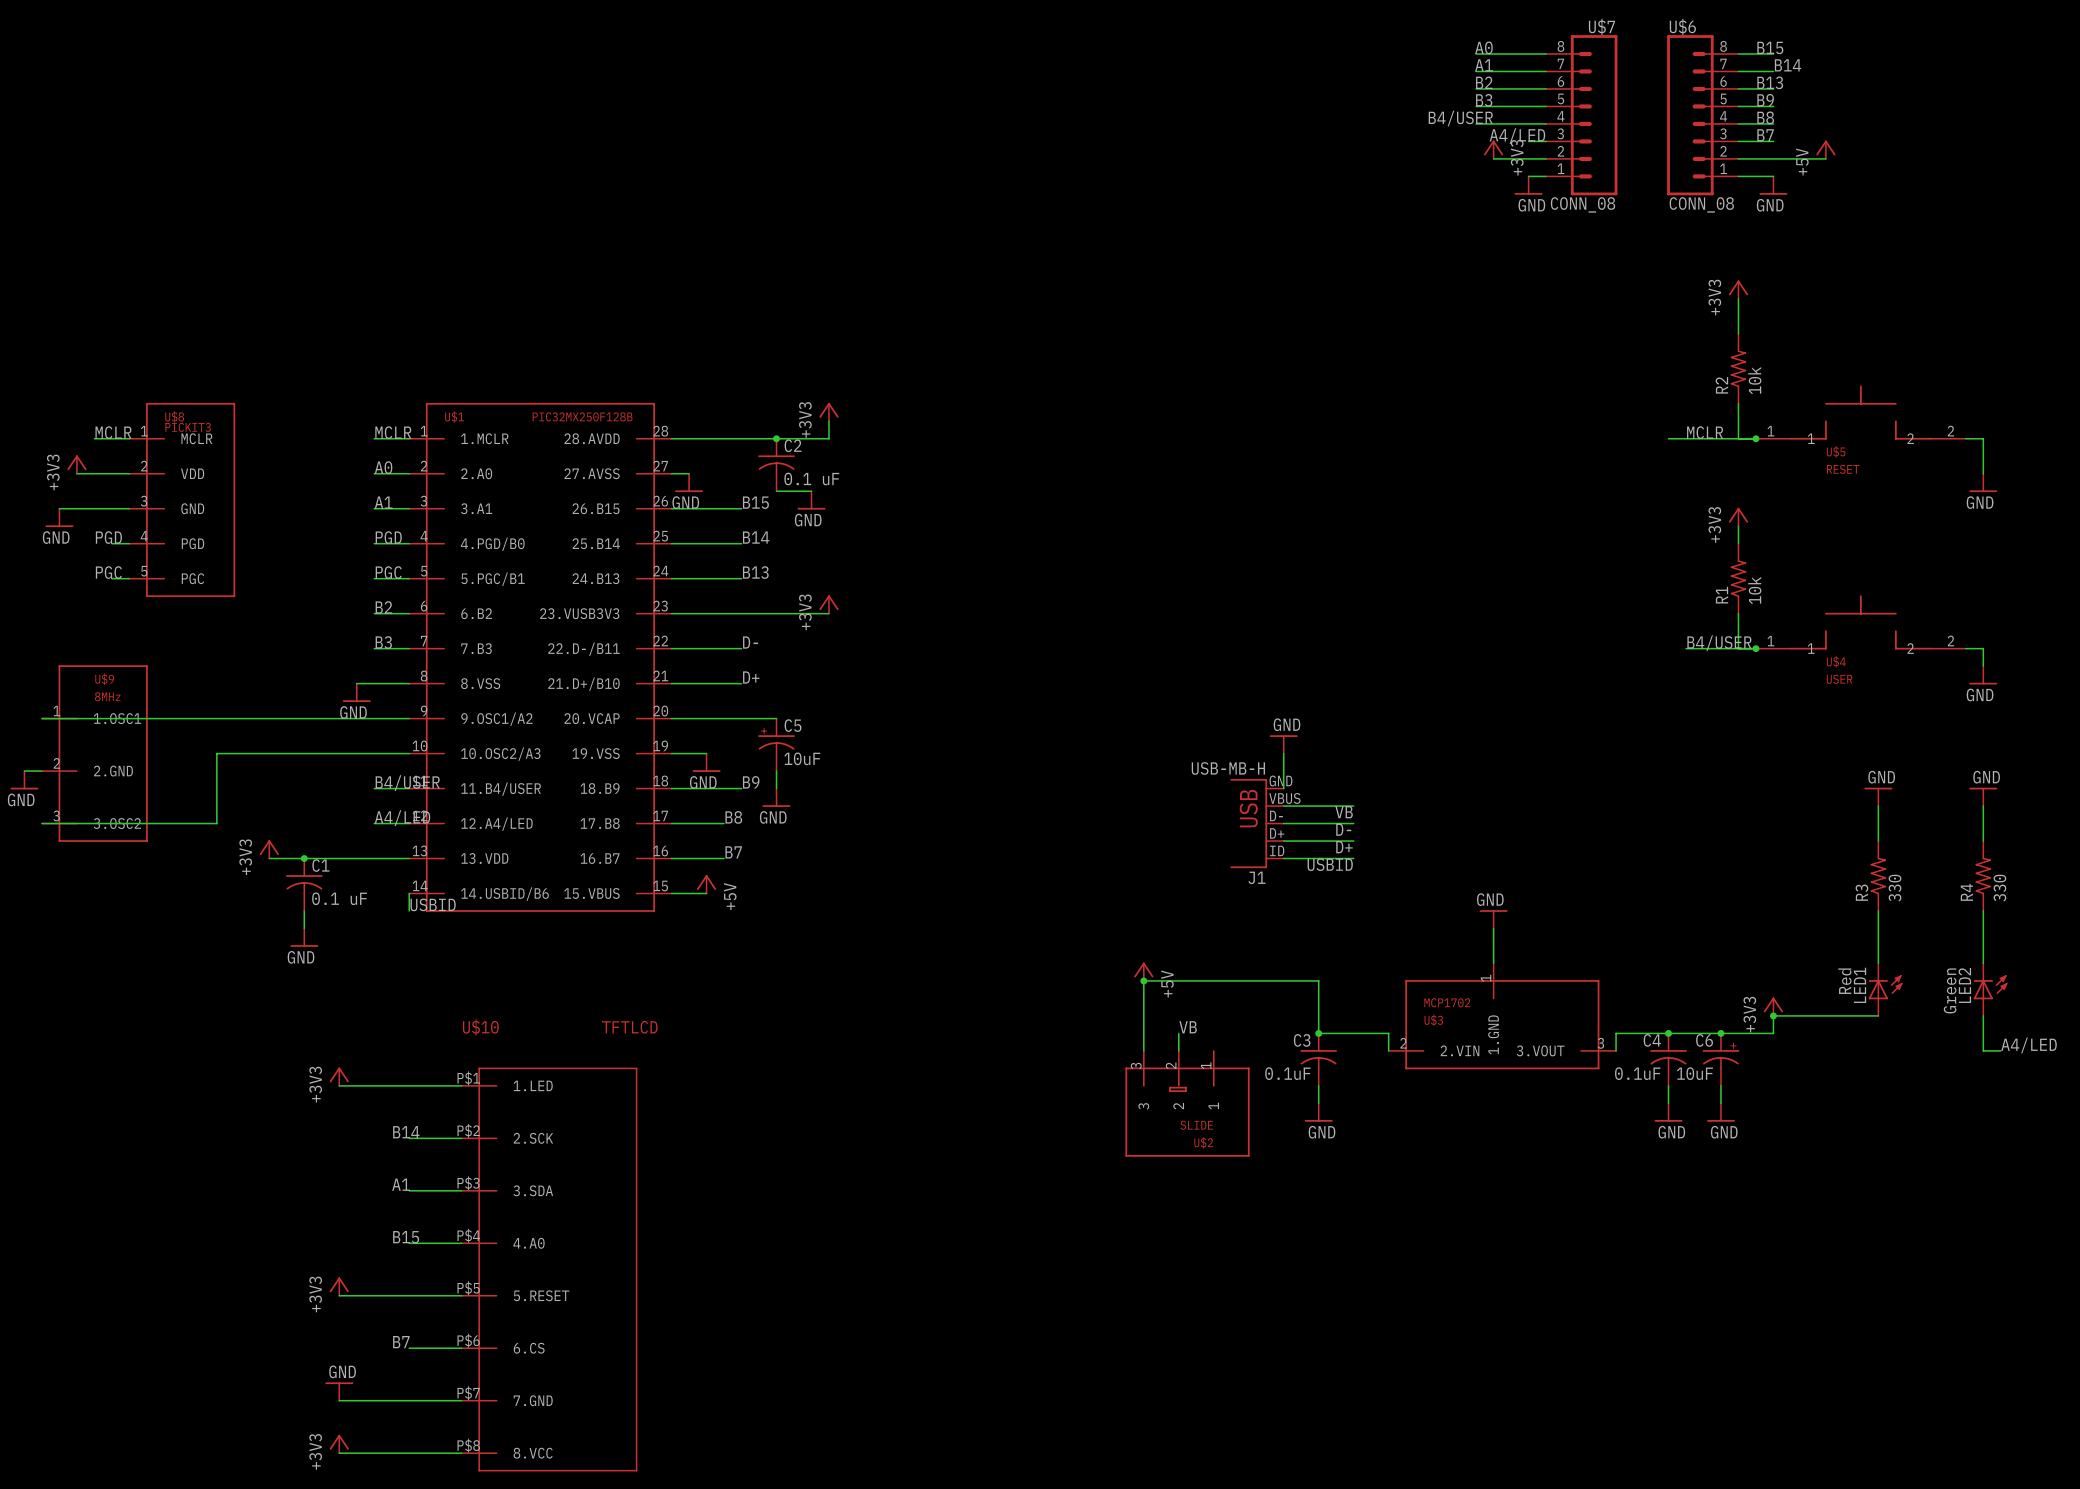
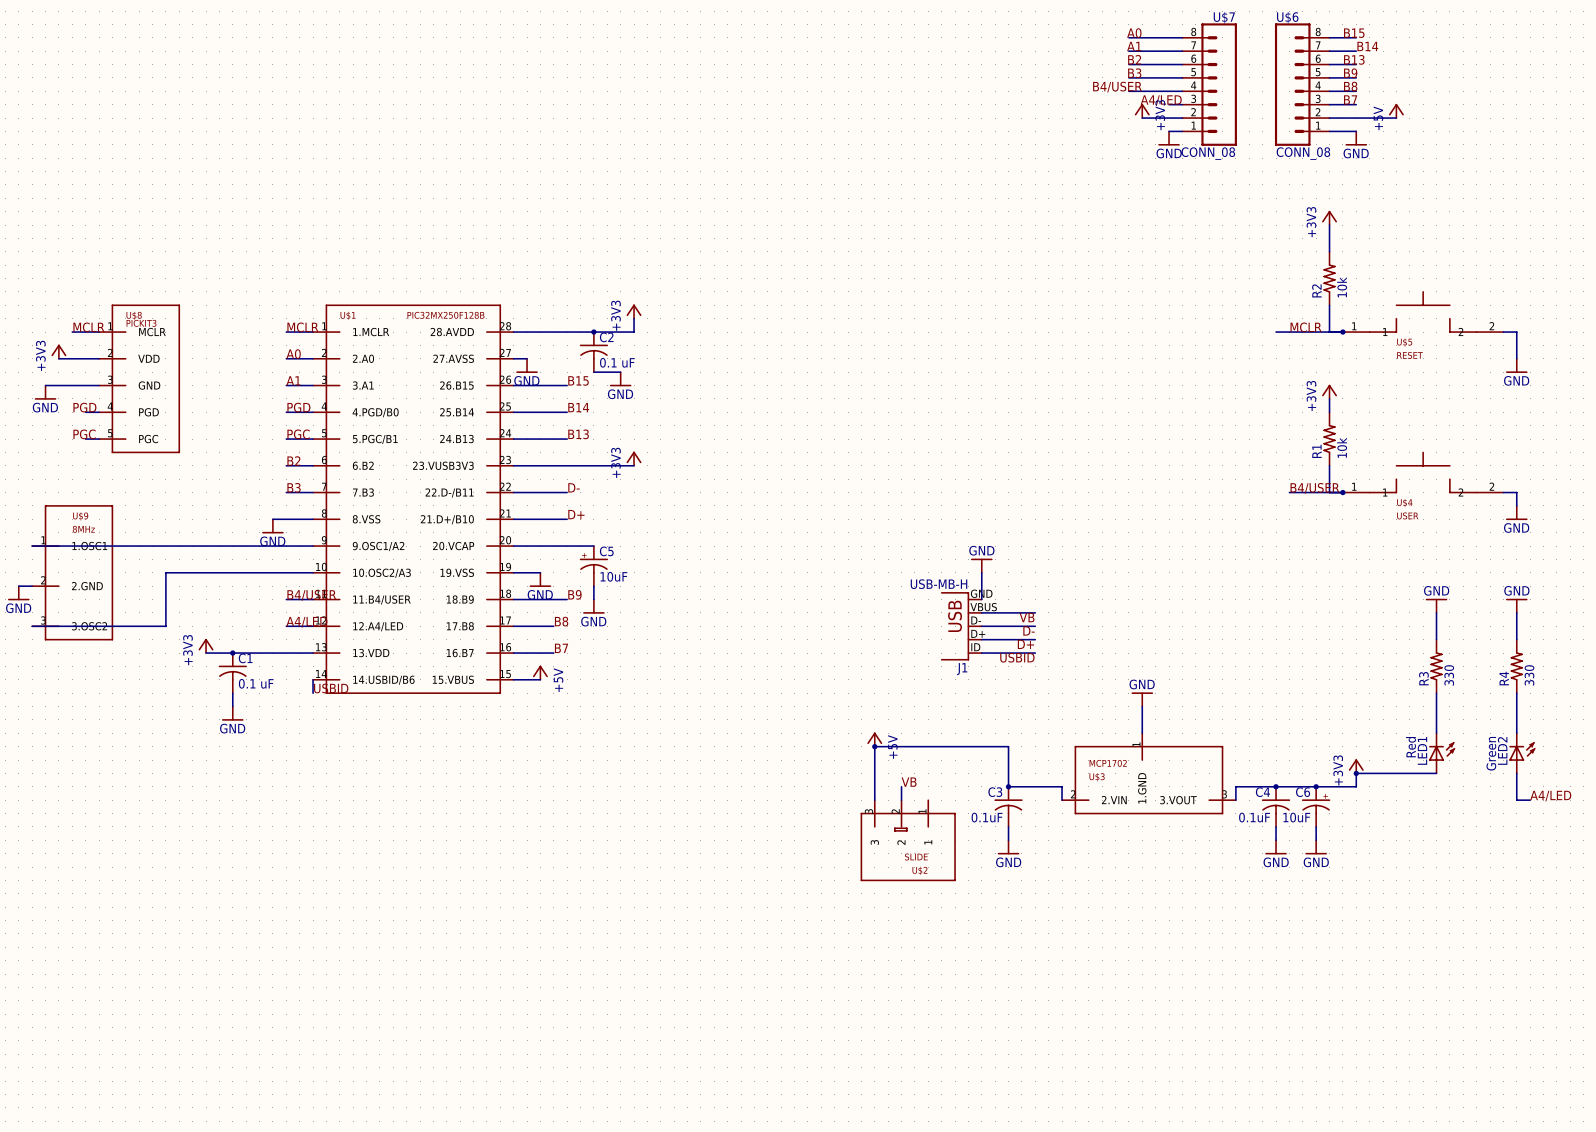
power symbol: +3V3 (339, 1076) -> none
wire: (339, 1085) (461, 1085) -> none
label: B14 (406, 1132) -> none
wire: (409, 1138) (461, 1138) -> none
label: A1 (401, 1184) -> none
wire: (409, 1190) (461, 1190) -> none
label: B15 (406, 1237) -> none
wire: (409, 1243) (461, 1243) -> none
U$10: TFTLCD (549, 1269) -> none
power symbol: +3V3 (339, 1286) -> none
wire: (339, 1295) (461, 1295) -> none
label: B7 (401, 1342) -> none
wire: (409, 1348) (461, 1348) -> none
power symbol: GND (339, 1391) -> none
wire: (339, 1400) (461, 1400) -> none
power symbol: +3V3 (339, 1444) -> none
wire: (339, 1453) (461, 1453) -> none

